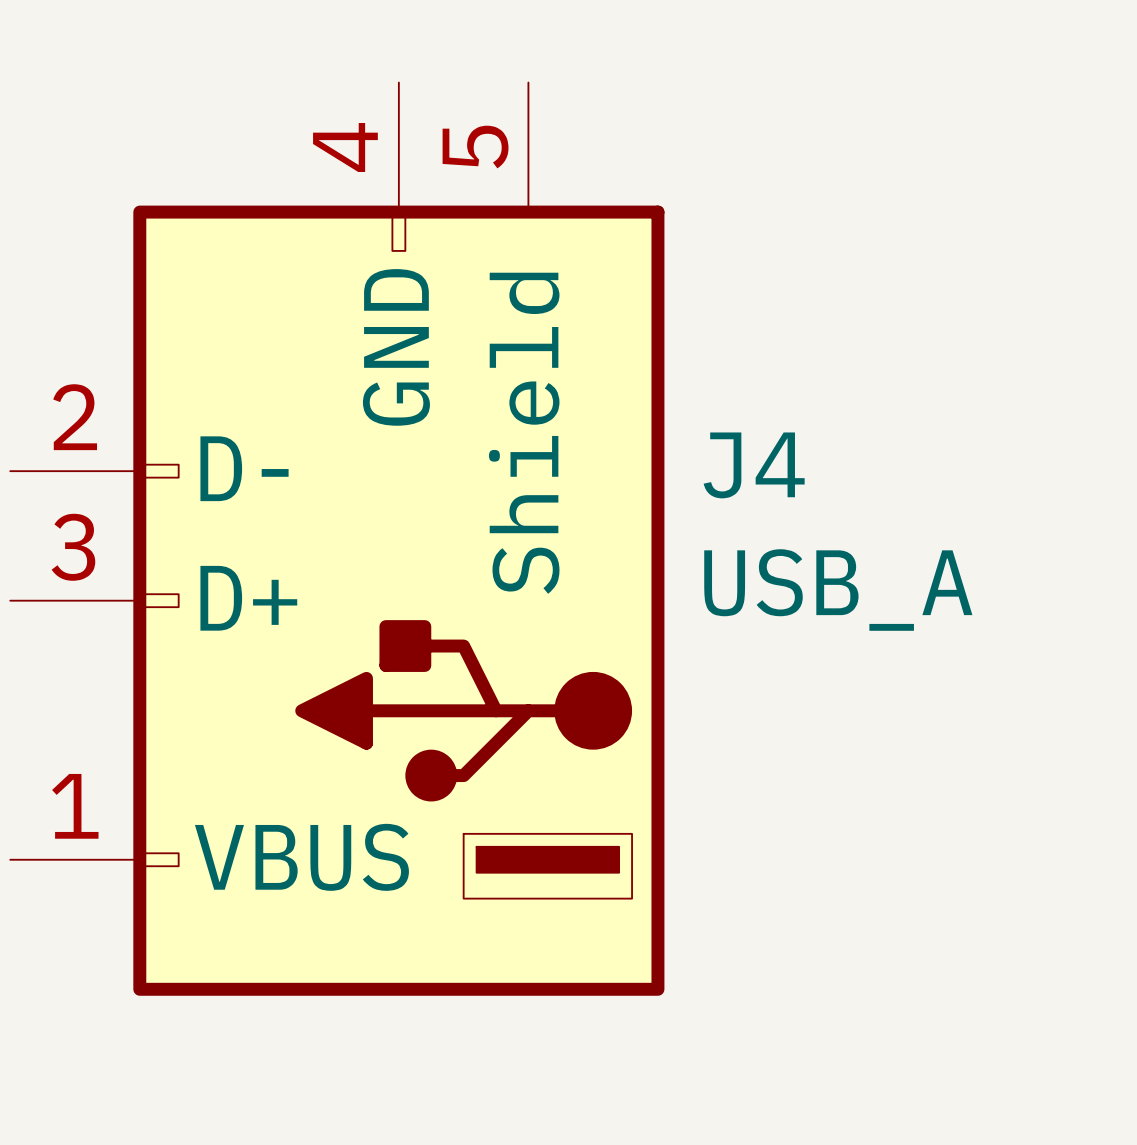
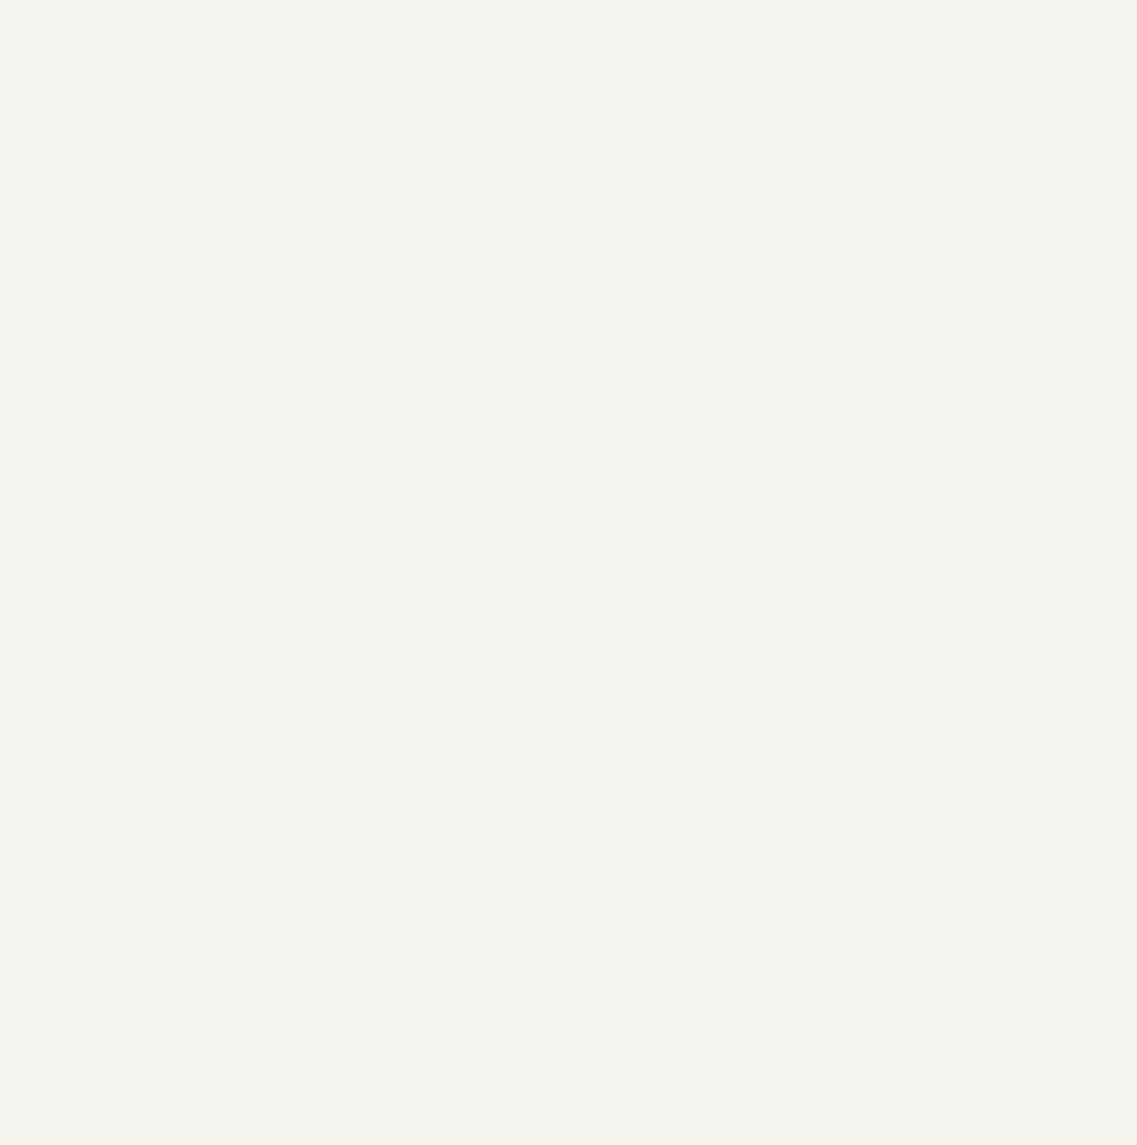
J4: USB_A (337, 539) -> none

